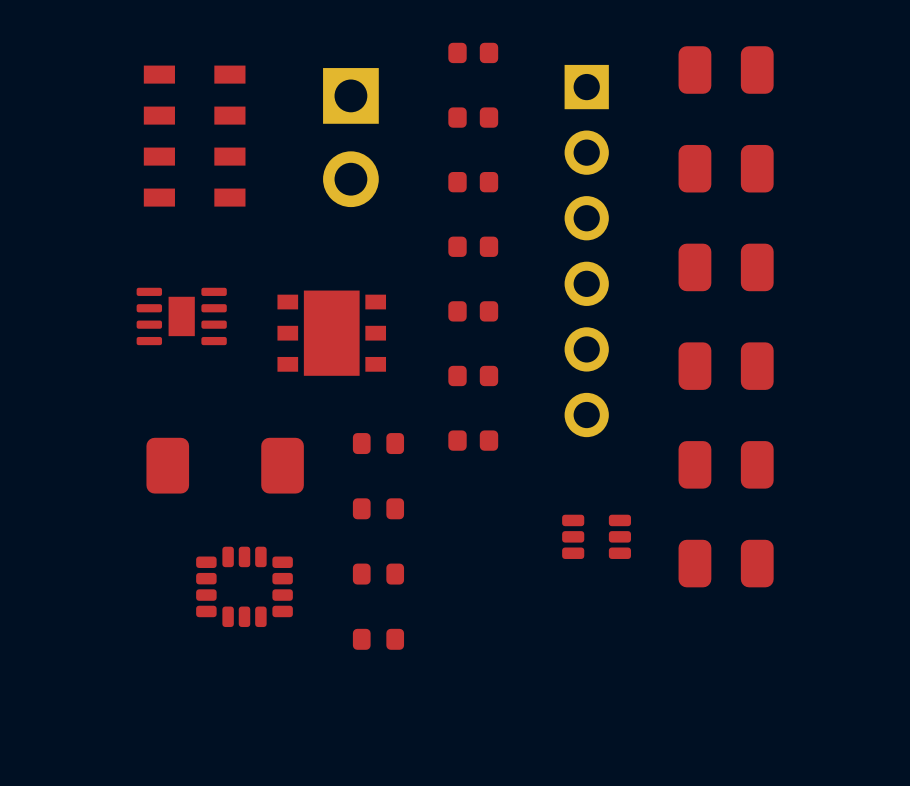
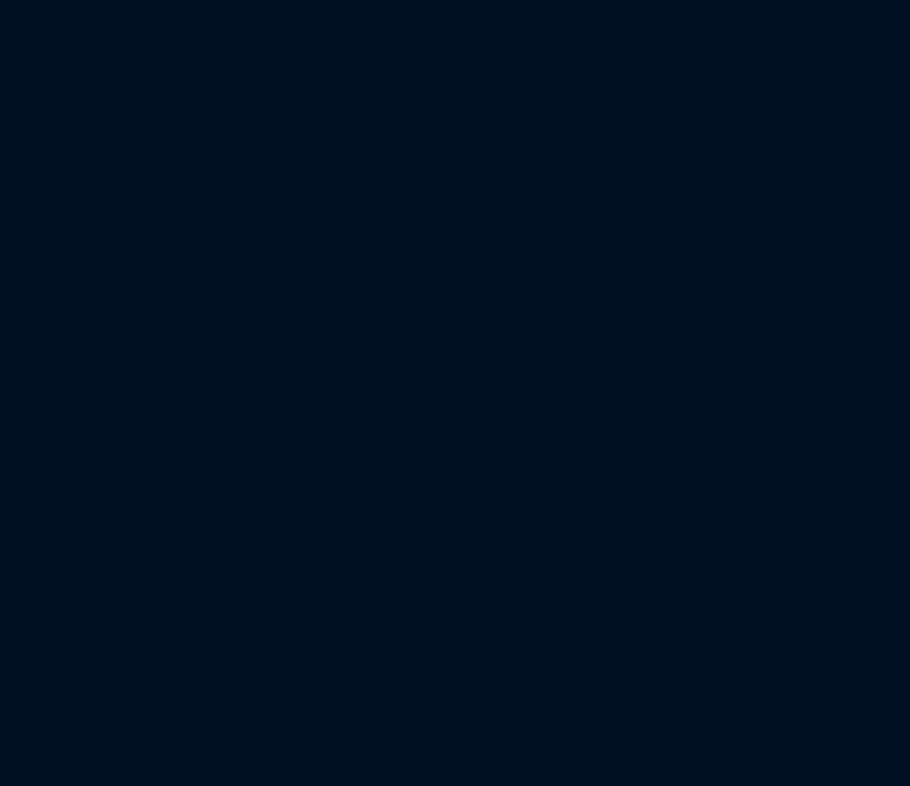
part: (473, 52) -> none
part: (726, 70) -> none
part: (473, 117) -> none
part: (194, 136) -> none
part: (350, 137) -> none
part: (726, 168) -> none
part: (473, 182) -> none
part: (473, 246) -> none
part: (586, 251) -> none
part: (726, 267) -> none
part: (473, 311) -> none
part: (181, 316) -> none
part: (331, 333) -> none
part: (726, 366) -> none
part: (473, 375) -> none
part: (473, 440) -> none
part: (378, 443) -> none
part: (726, 464) -> none
part: (225, 465) -> none
part: (378, 508) -> none
part: (596, 536) -> none
part: (726, 563) -> none
part: (378, 574) -> none
part: (244, 586) -> none
part: (378, 639) -> none

